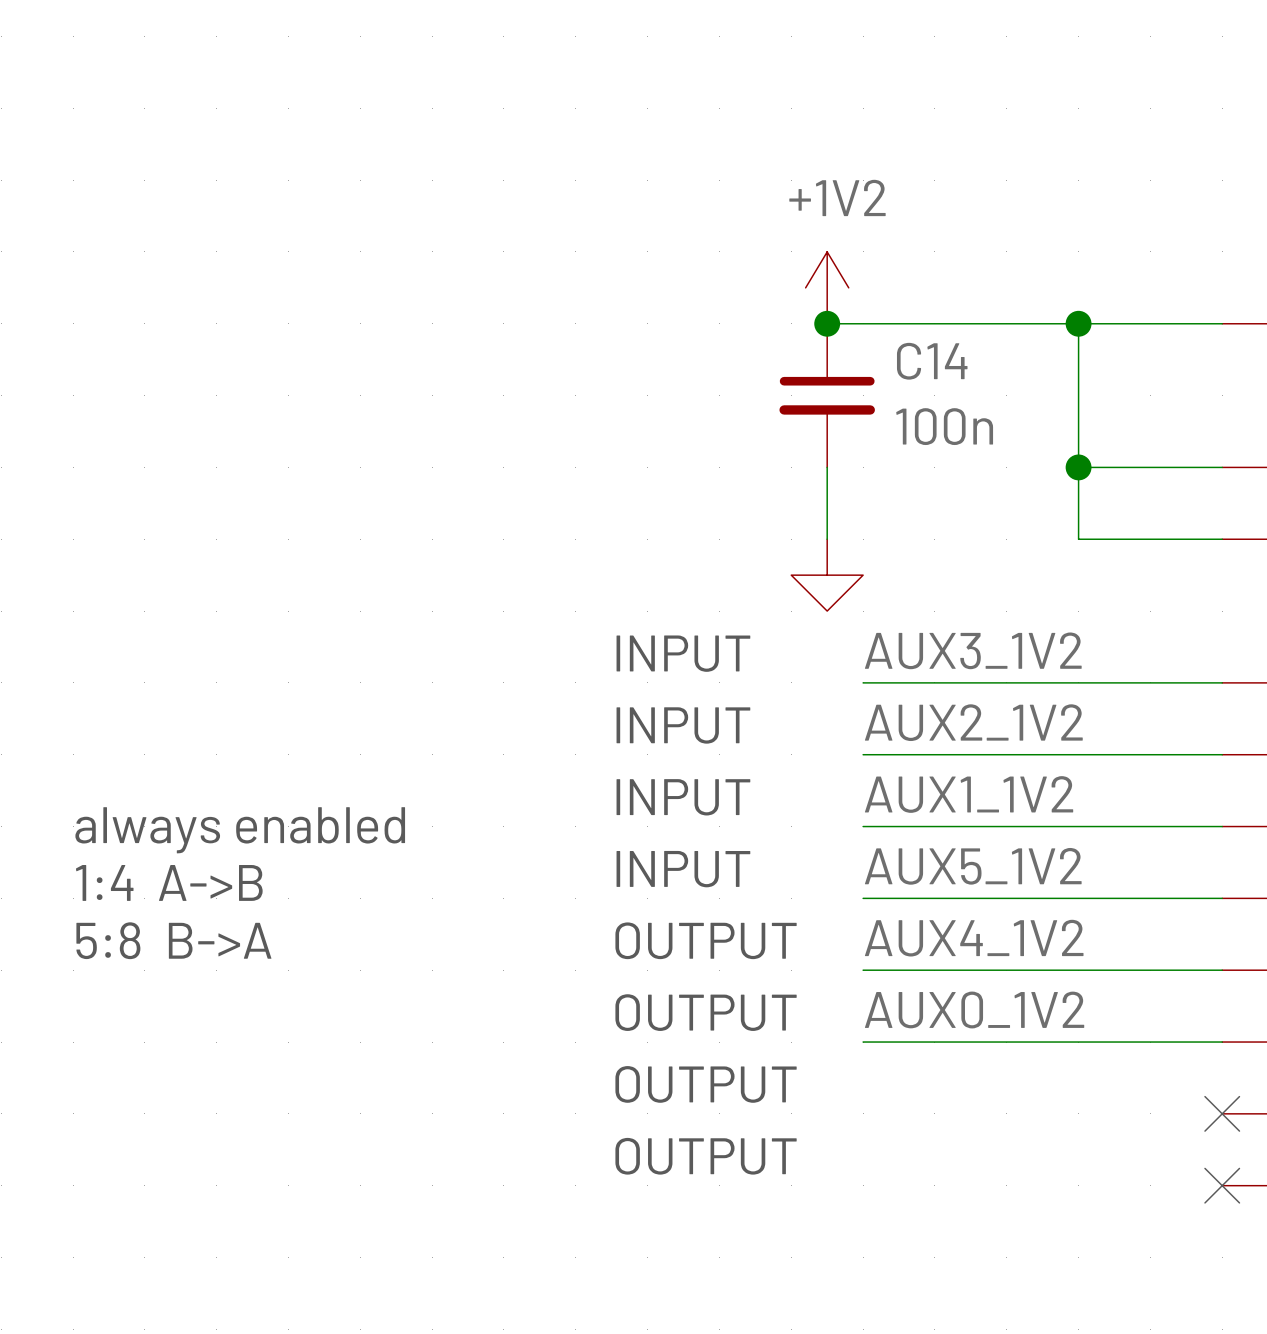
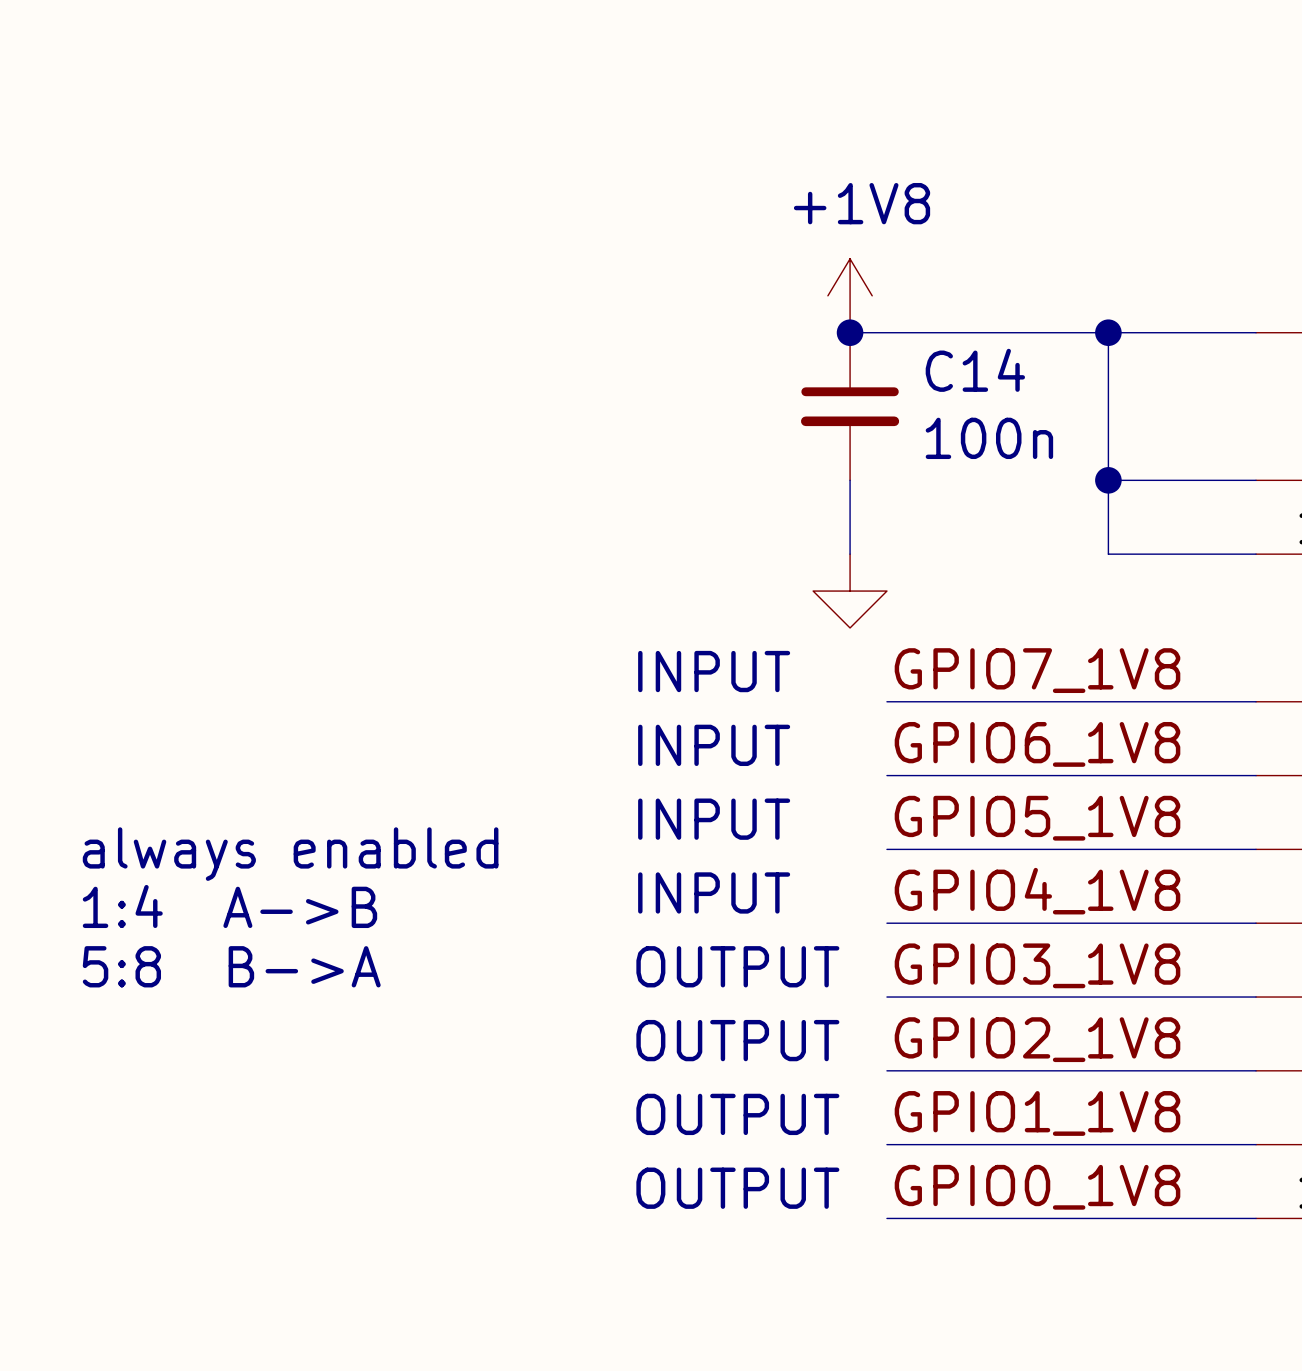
power symbol: +1V2 (827, 287) -> +1V8 (850, 295)
label: AUX3_1V2 (973, 650) -> GPIO7_1V8 (1037, 670)
label: AUX2_1V2 (973, 722) -> GPIO6_1V8 (1037, 744)
label: AUX1_1V2 (968, 794) -> GPIO5_1V8 (1037, 818)
label: AUX5_1V2 (973, 866) -> GPIO4_1V8 (1037, 891)
label: AUX4_1V2 (974, 938) -> GPIO3_1V8 (1037, 965)
label: AUX0_1V2 (974, 1010) -> GPIO2_1V8 (1037, 1039)
label: none -> GPIO1_1V8 (1037, 1113)
wire: none -> (886, 1144) (1256, 1144)
no-connect mark: (1222, 1113) -> none
label: none -> GPIO0_1V8 (1037, 1187)
wire: none -> (886, 1218) (1256, 1218)
no-connect mark: (1222, 1185) -> none

